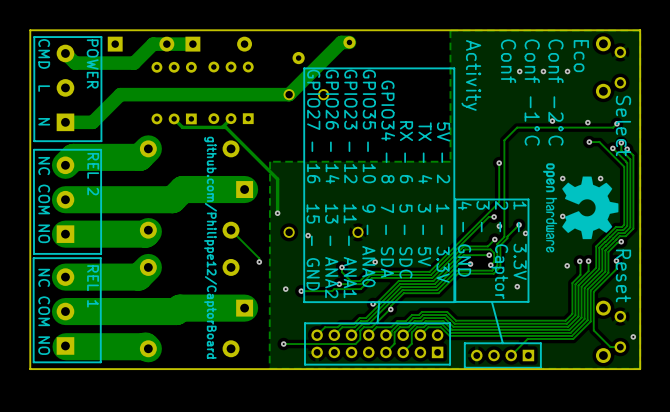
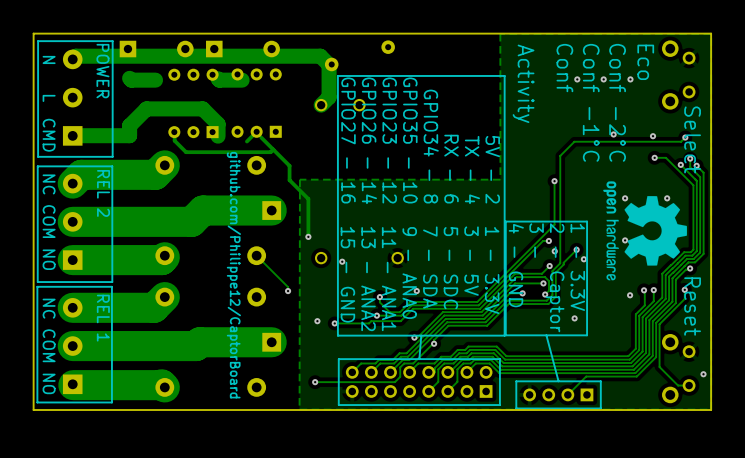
track: (349, 42) (341, 42) (296, 87) -> none
track: (192, 44) (153, 44) (134, 63) (75, 63) (65, 53) -> (329, 97) (329, 64) (320, 56) (75, 56) (72, 59)
text: CMD (44, 53) -> N (49, 59)
track: none -> (129, 78) (131, 80) (155, 80)
track: none -> (218, 78) (242, 80)
track: (289, 94) (120, 94) (92, 122) (65, 122) -> (218, 136) (218, 124) (202, 108) (146, 108) (129, 125) (129, 135) (72, 135)
track: (174, 118) (182, 127) (225, 127) (260, 162) -> (261, 137) (289, 165) (289, 180)
text: N (44, 121) -> CMD (49, 135)
track: none -> (174, 137) (174, 140) (186, 152) (270, 152) (273, 149)

